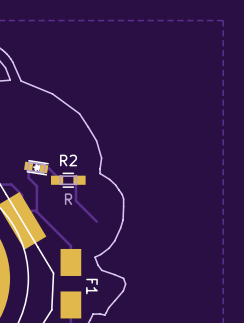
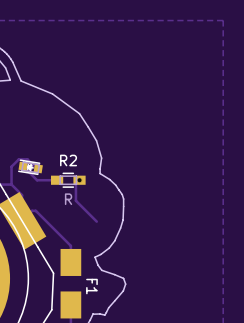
track: none -> (23, 166) (37, 180) (57, 180)
track: (28, 166) (28, 177) (36, 186) (36, 211) -> none
part rotation: 0° (36, 167) -> 180° (30, 167)
track: none -> (38, 168) (27, 159) (18, 159) (11, 166) (11, 184)
track: (43, 168) (49, 168) (60, 180) -> none
via: none -> (79, 180)

